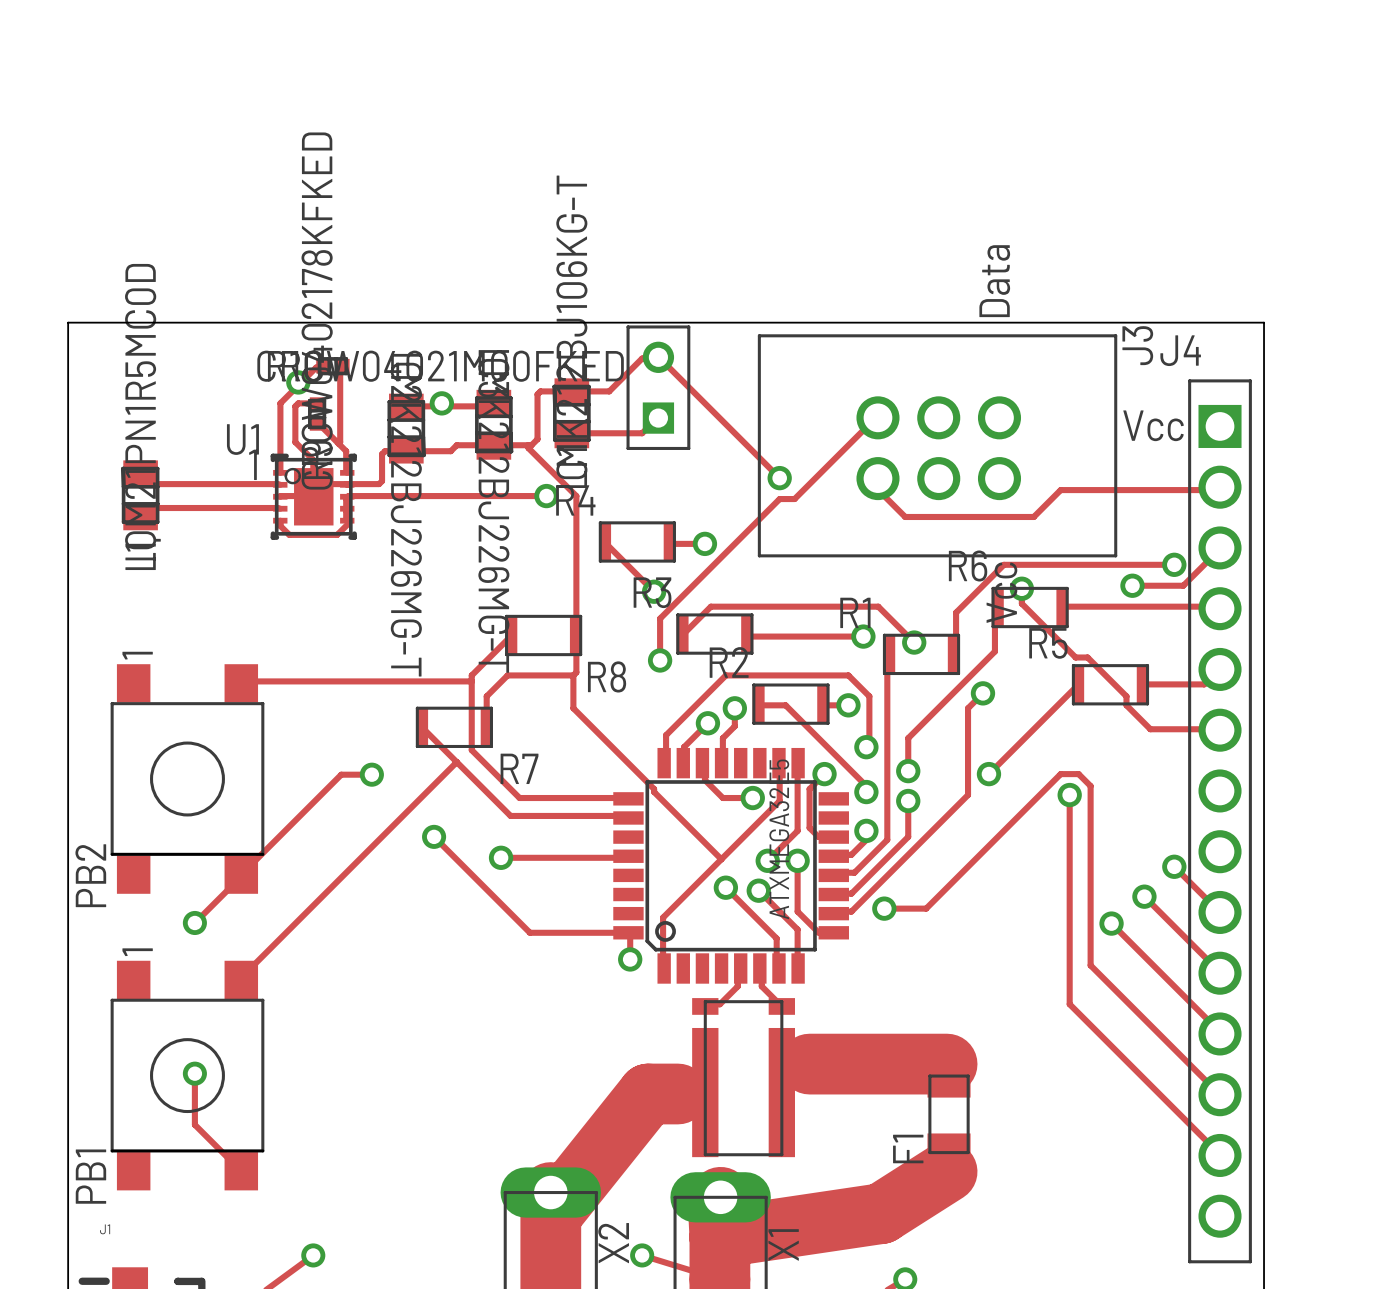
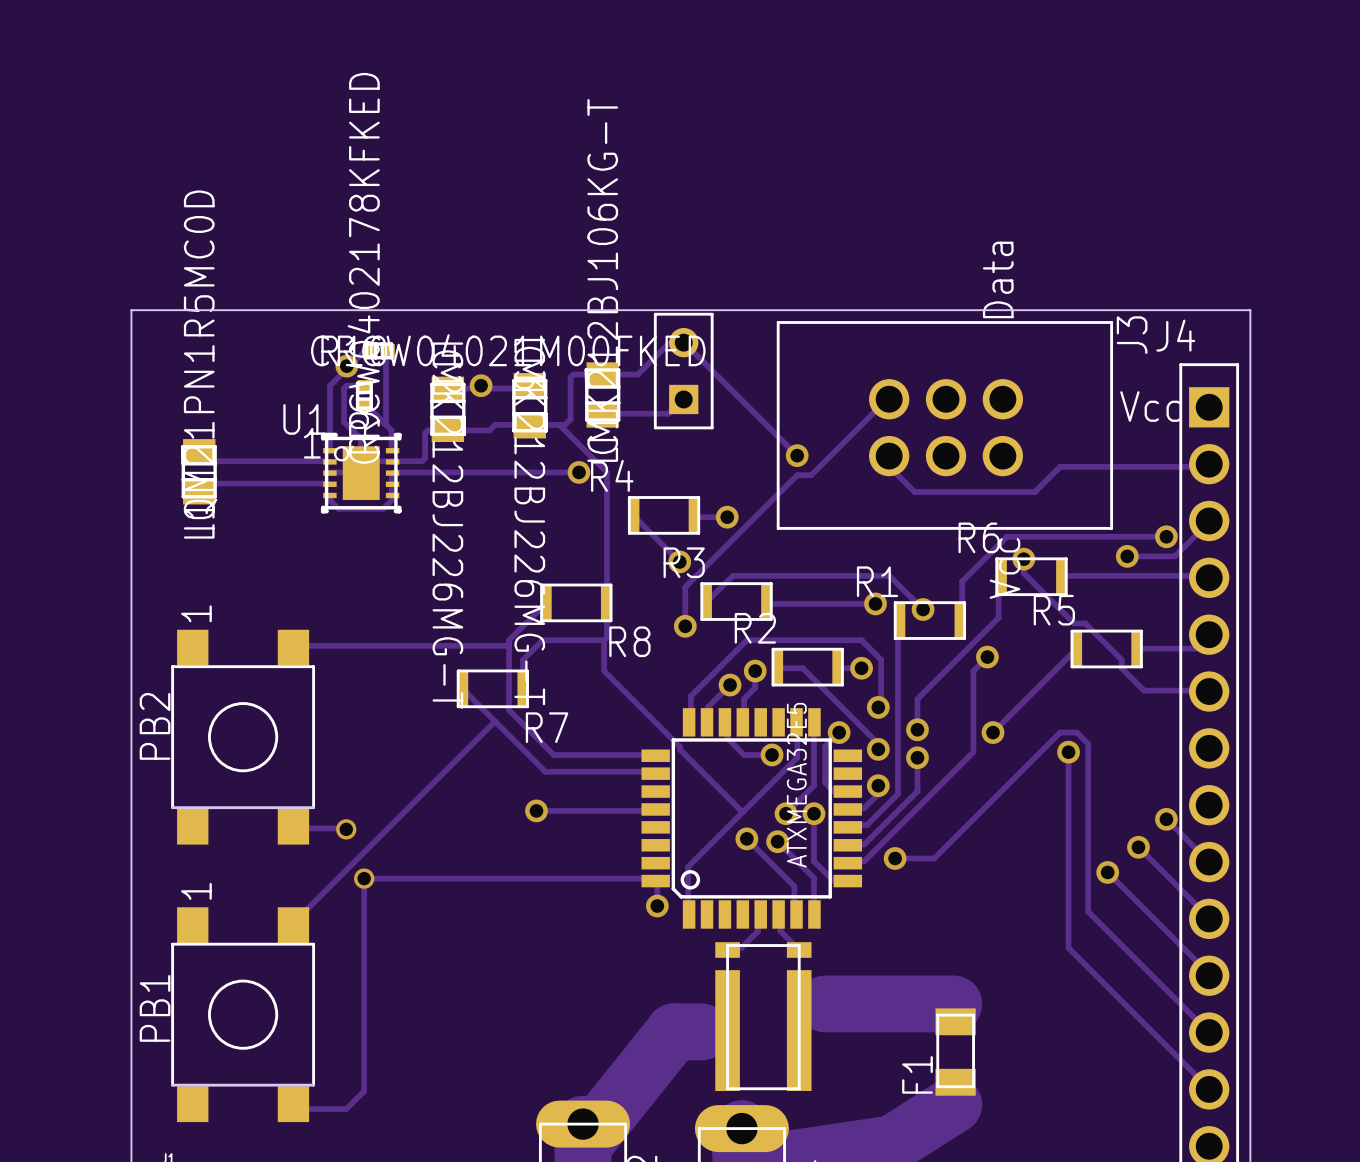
track: (371, 774) (341, 774) (241, 874) -> none
via: (371, 774) -> none
track: (434, 836) (529, 932) (628, 932) -> (293, 1104) (298, 1109) (346, 1109) (364, 1091) (364, 878) (653, 878) (655, 881)
via: (434, 836) -> none
PB2 name position: PB2 (90, 875) -> PB2 (155, 726)
track: (241, 876) (194, 922) -> (293, 828) (346, 829)
via: none -> (346, 829)
via: (194, 922) -> none
via: none -> (364, 878)
track: (194, 1073) (194, 1124) (241, 1171) -> none
via: (194, 1073) -> none
PB1 name position: PB1 (90, 1176) -> PB1 (155, 1008)

